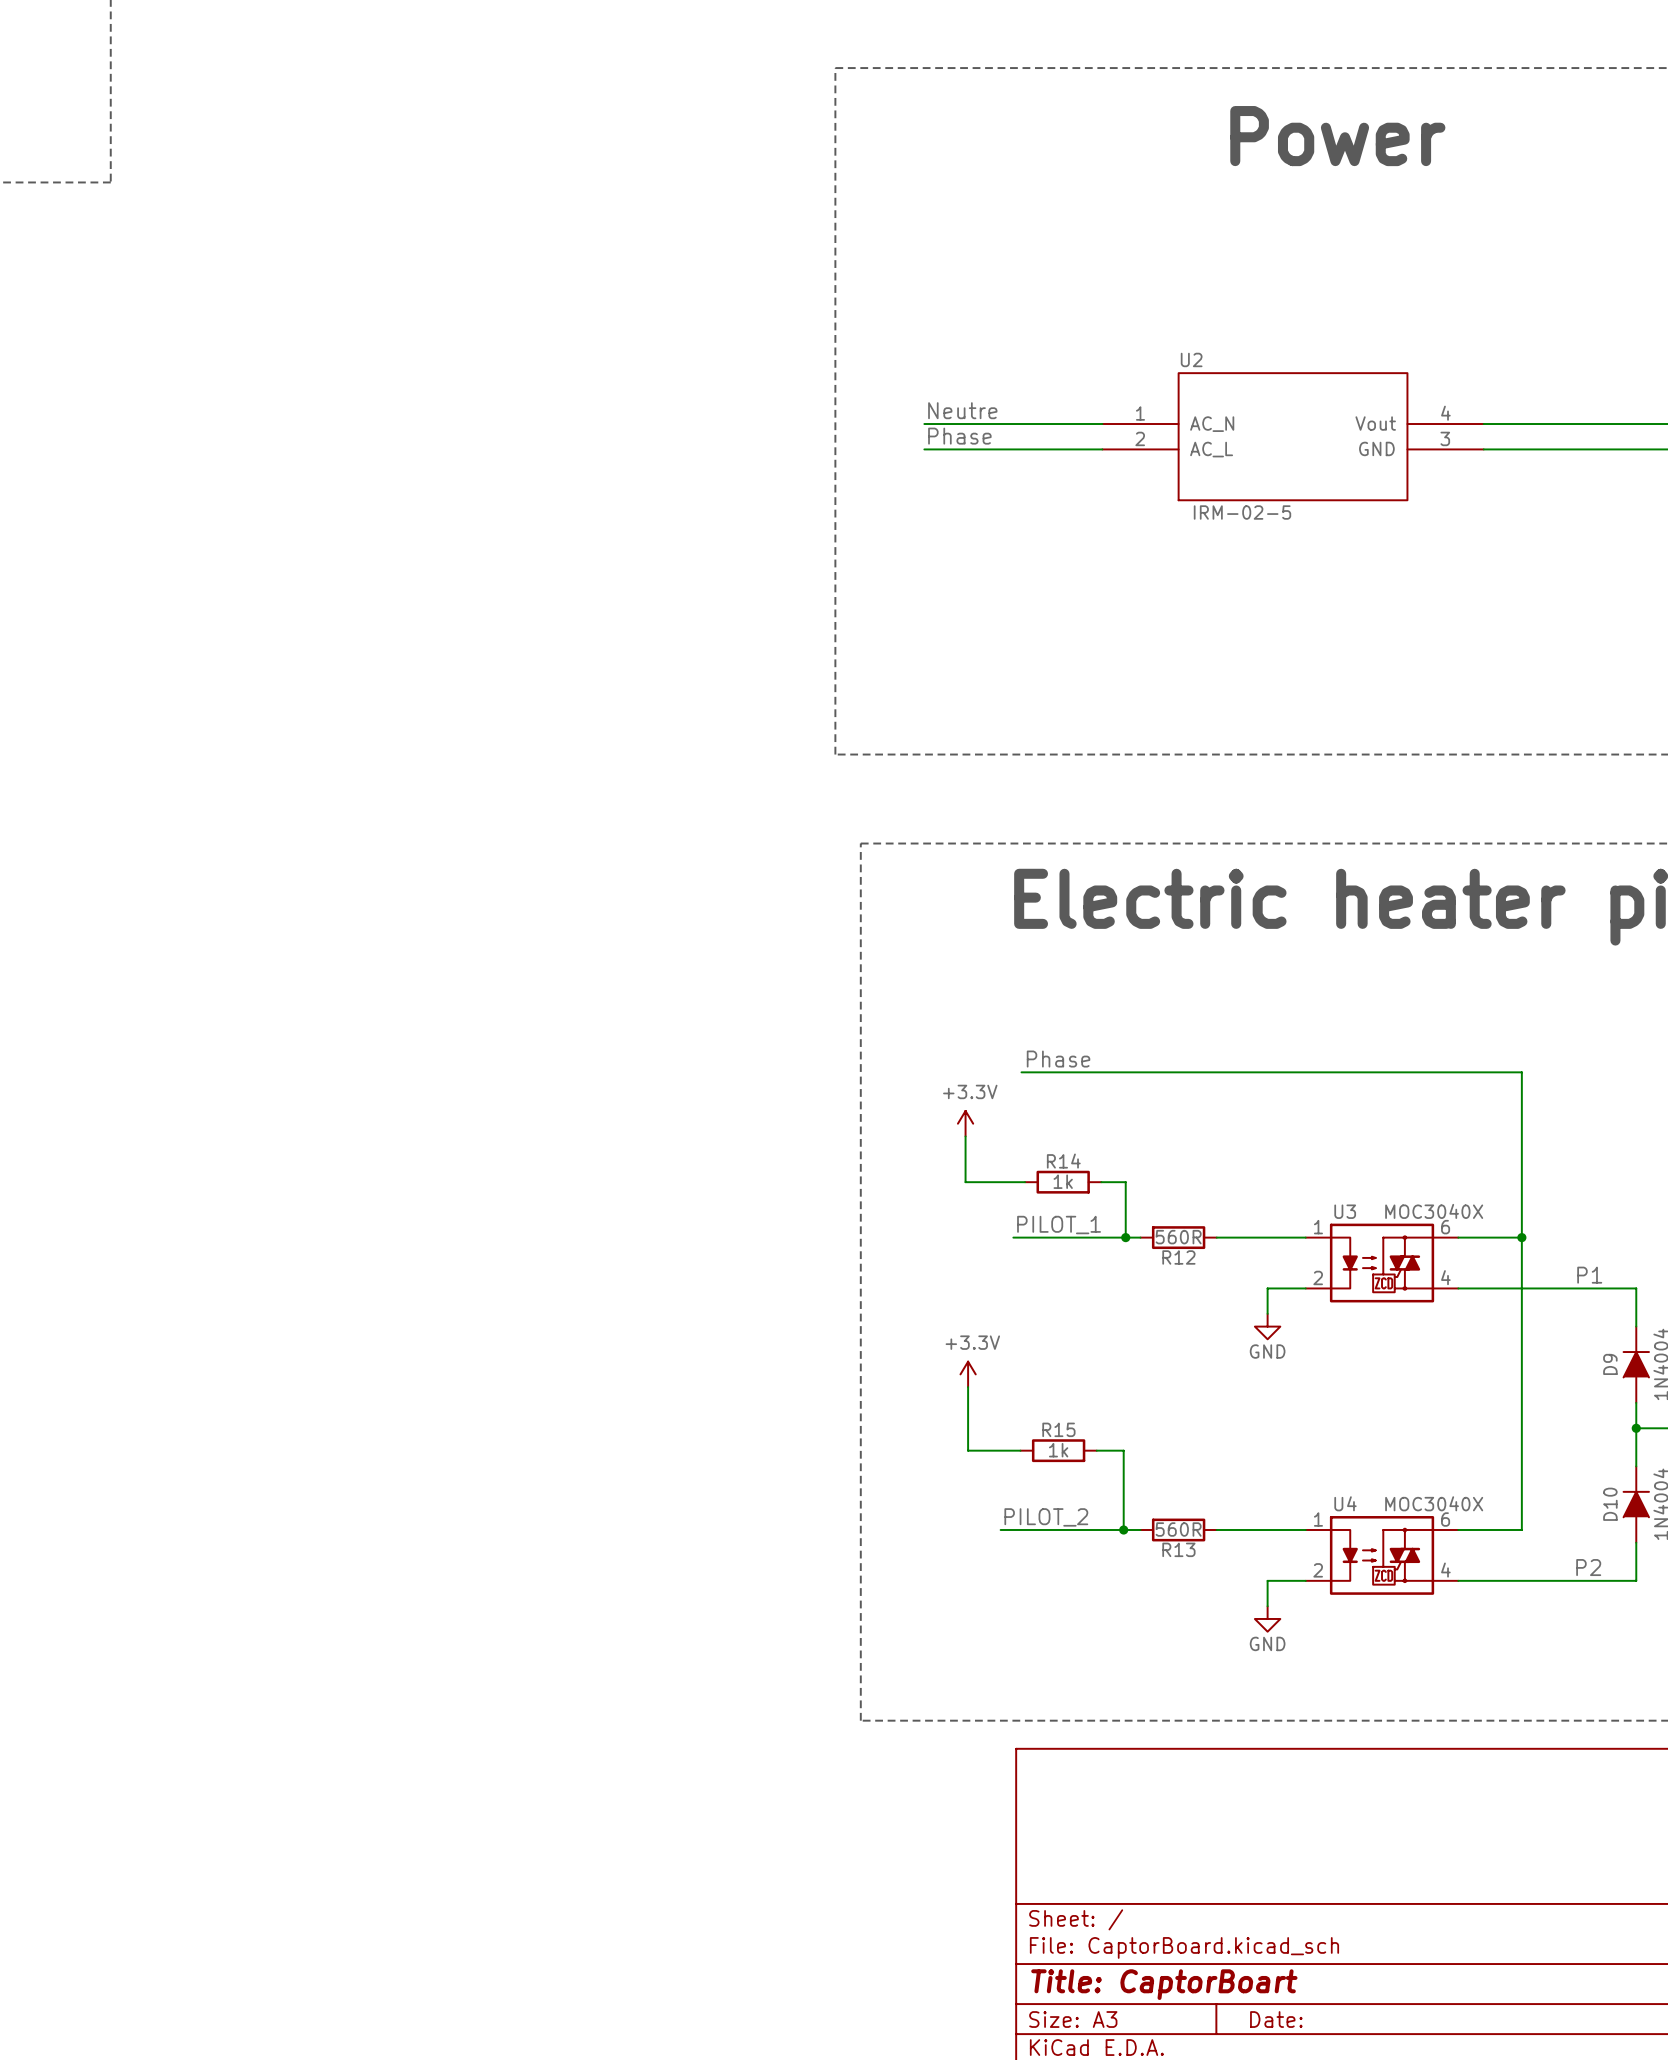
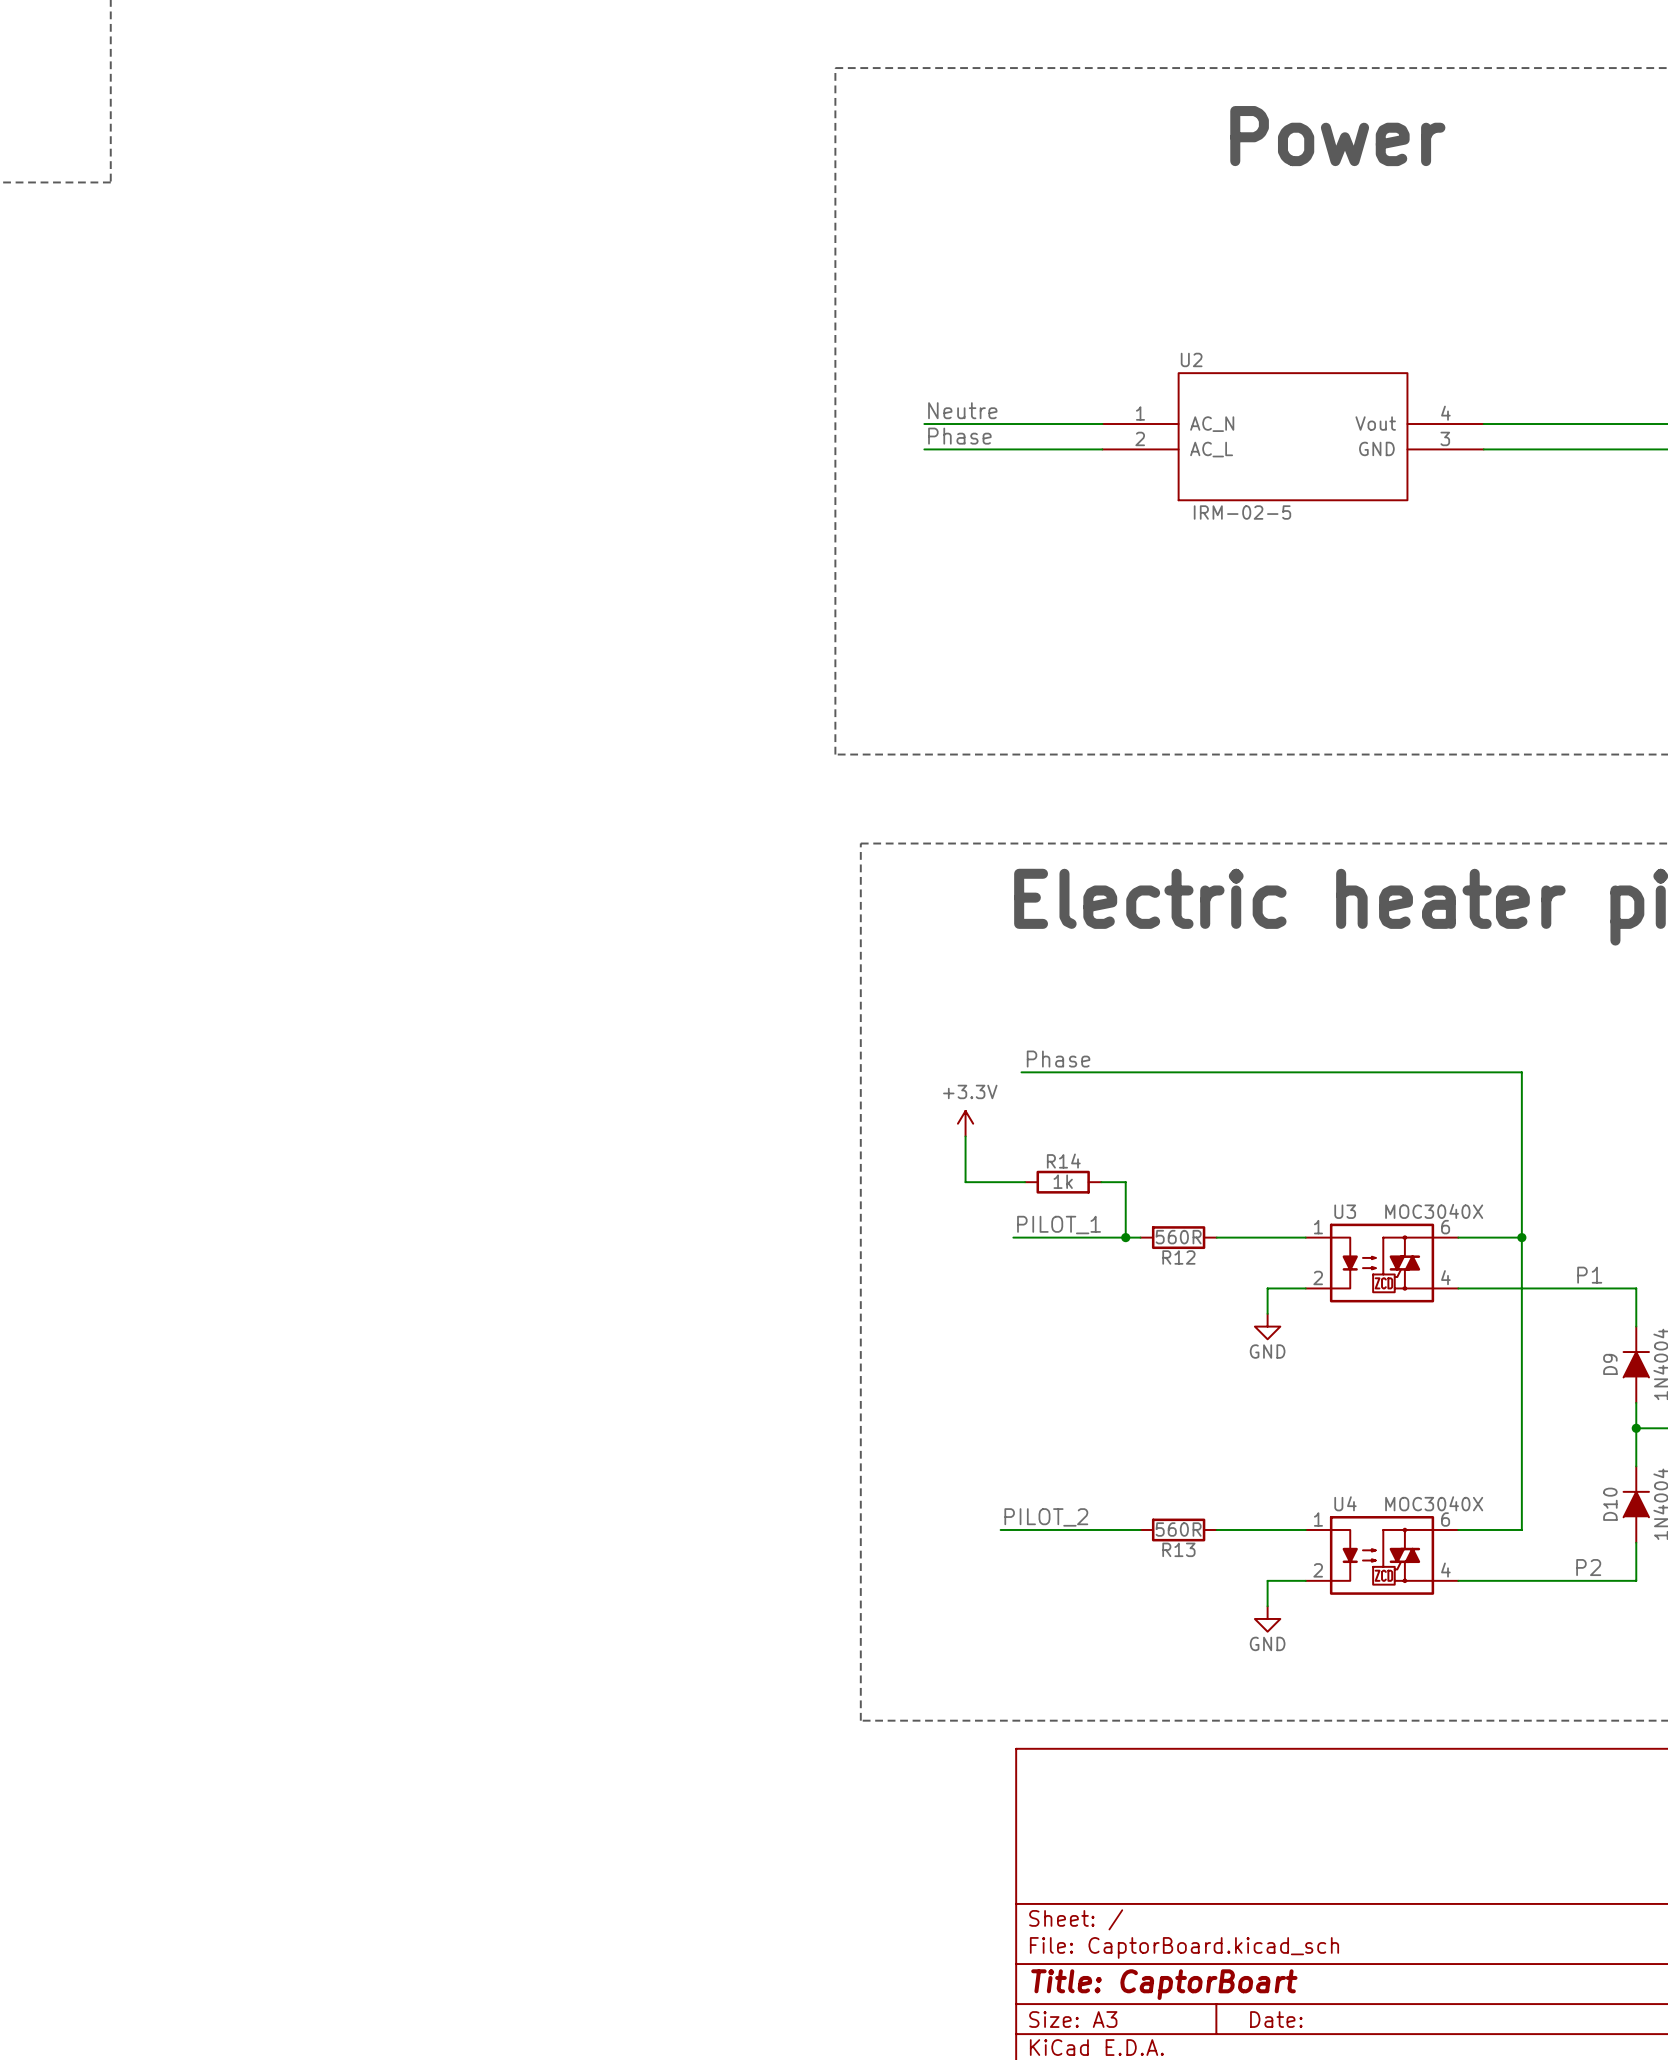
power symbol: +3.3V (968, 1374) -> none
wire: (968, 1387) (968, 1450) (1020, 1450) -> none
R15: 1k (1058, 1450) -> none
wire: (1096, 1450) (1123, 1450) (1123, 1529) -> none
junction: (1123, 1529) -> none

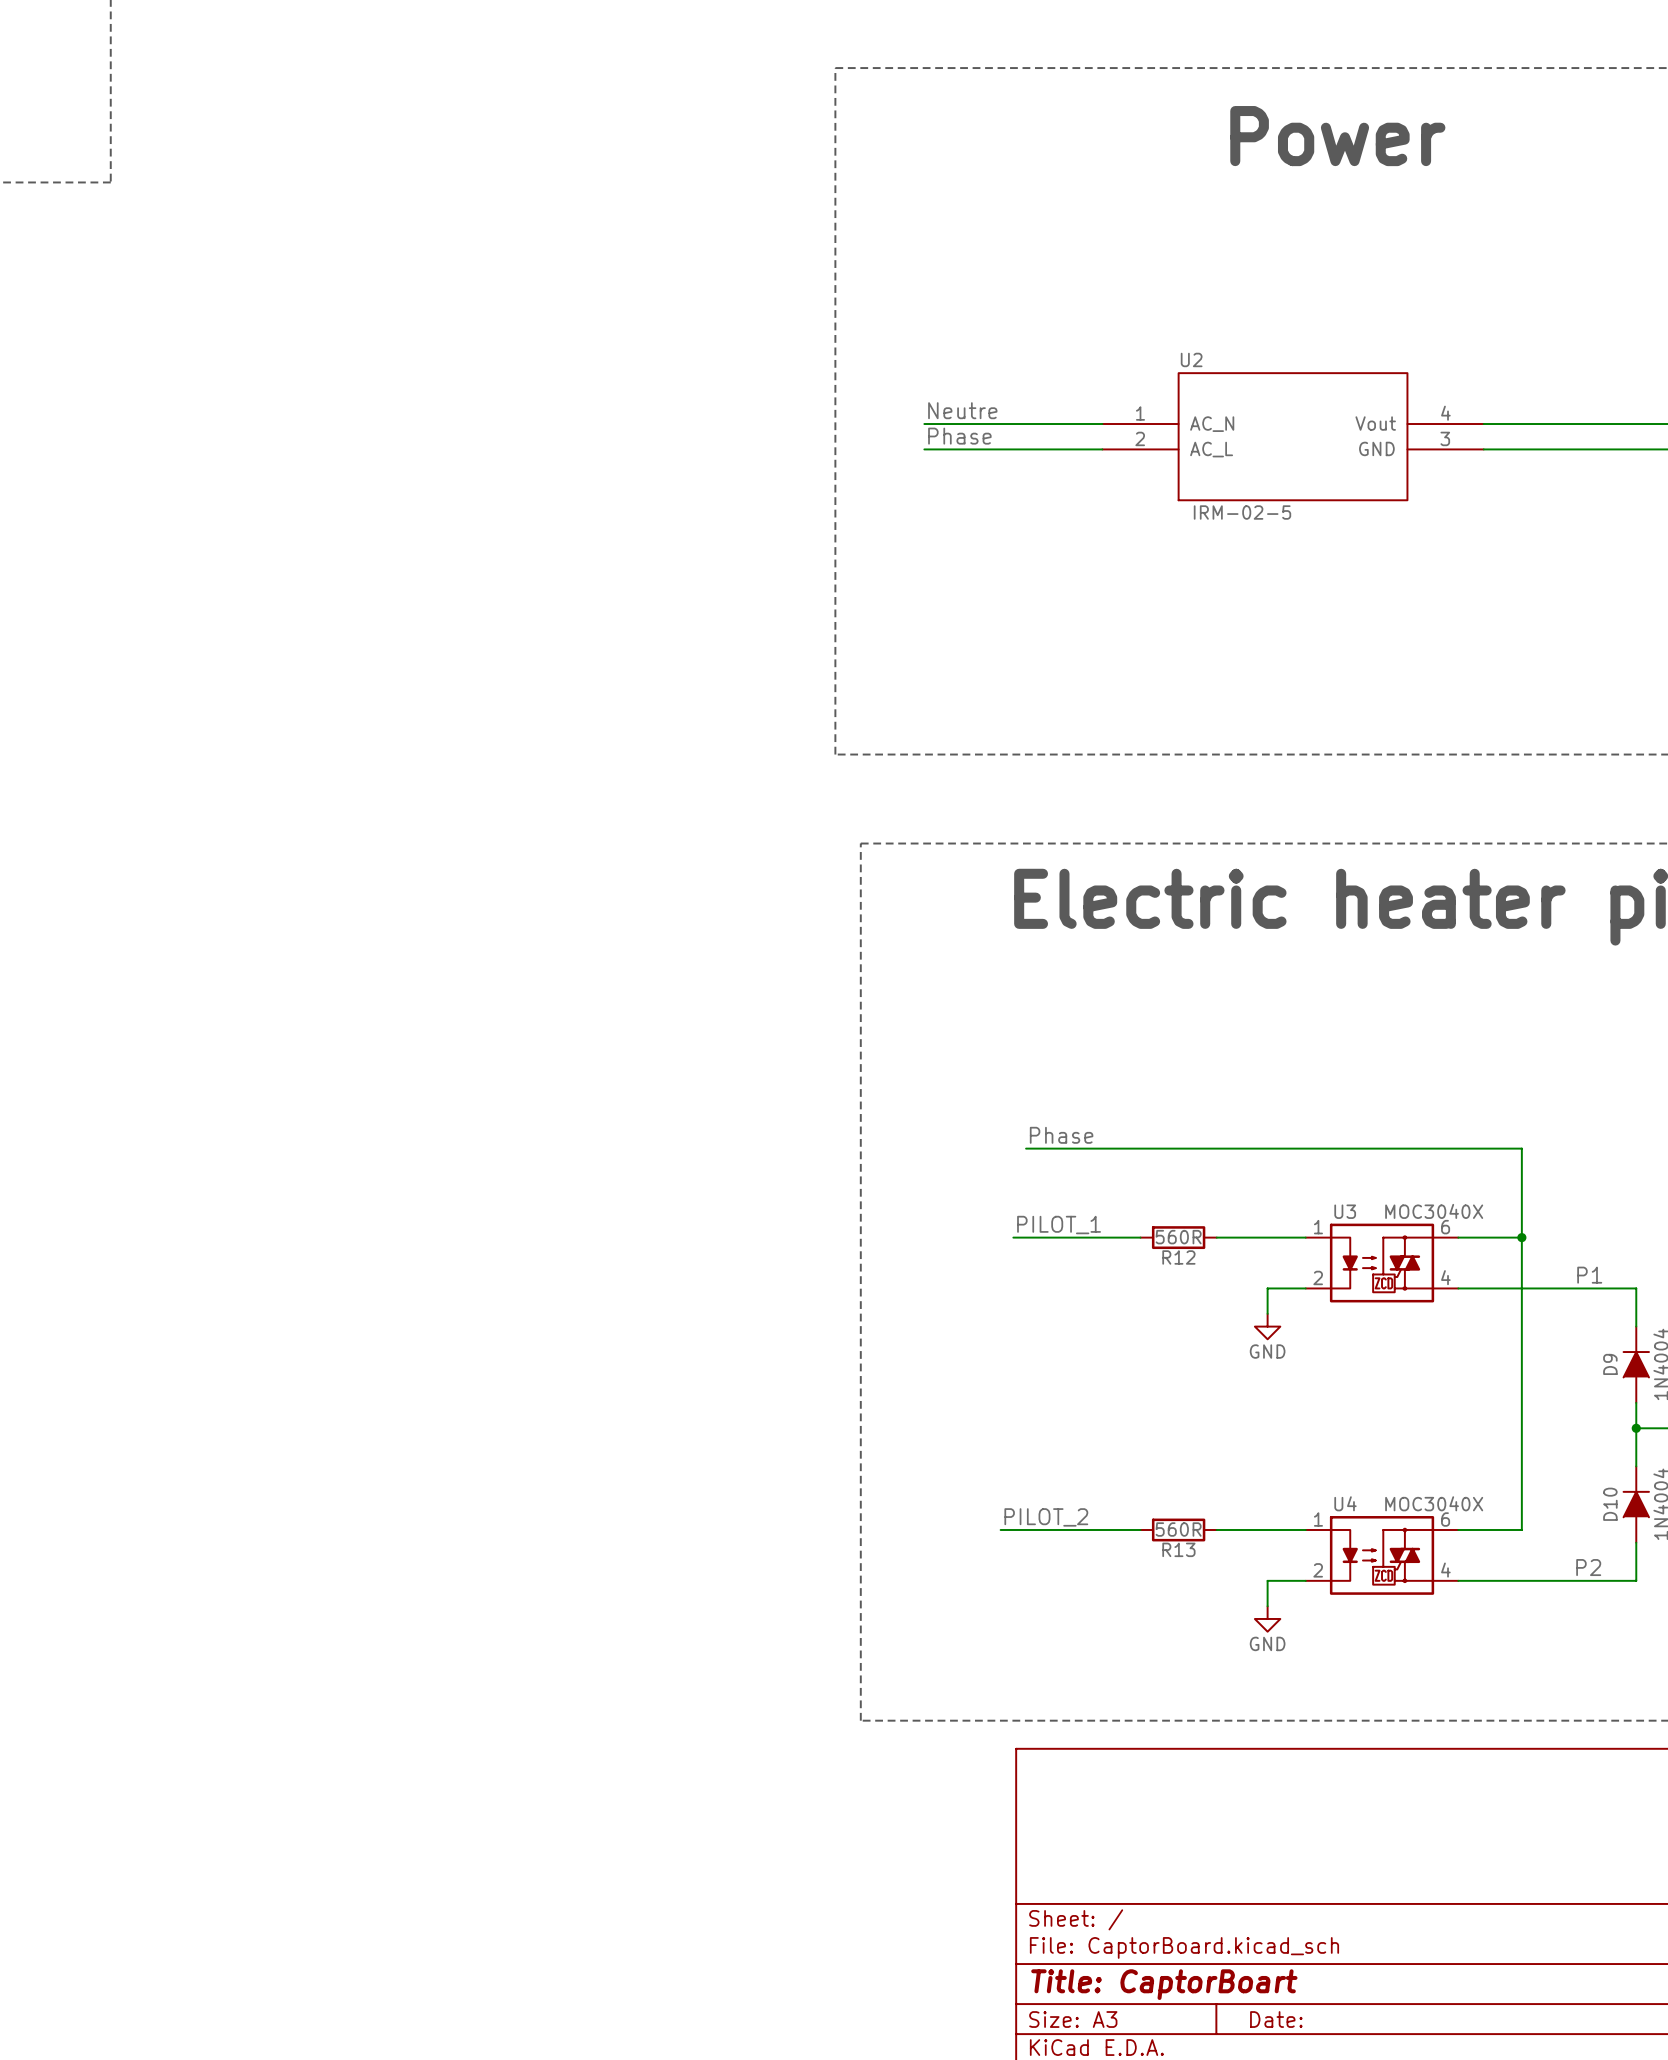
label position: Phase (1058, 1059) -> Phase (1061, 1135)
wire: (1021, 1072) (1521, 1072) (1521, 1148) -> (1026, 1148) (1521, 1148)
power symbol: +3.3V (965, 1123) -> none
wire: (965, 1136) (965, 1182) (1025, 1182) -> none
R14: 1k (1063, 1182) -> none
wire: (1101, 1182) (1125, 1182) (1125, 1237) -> none
junction: (1125, 1237) -> none

